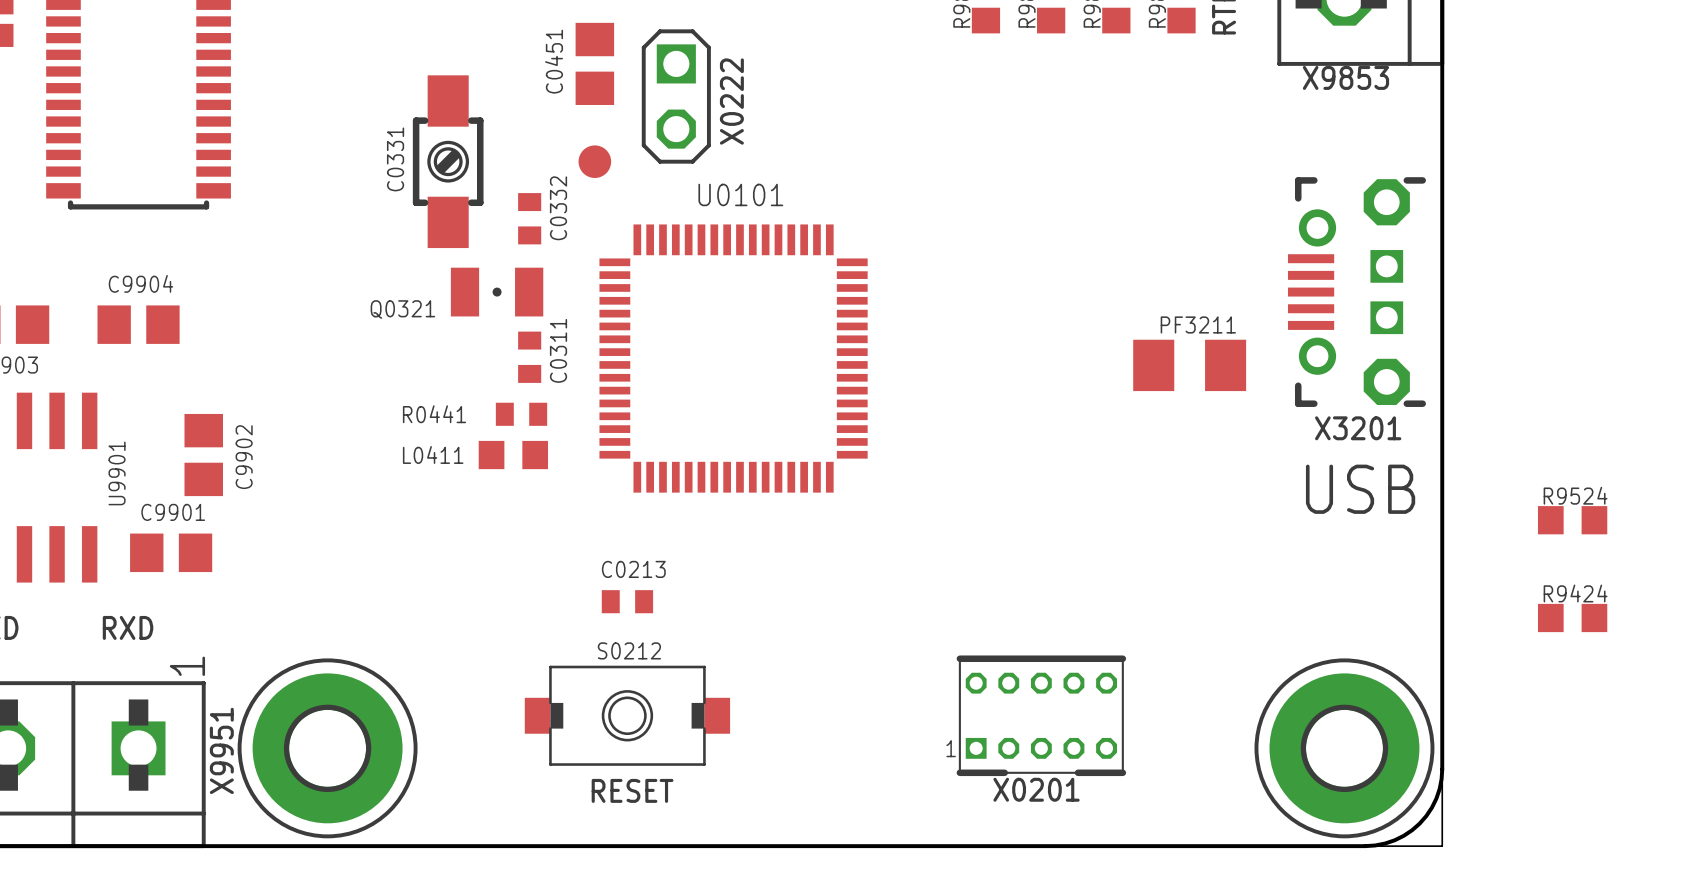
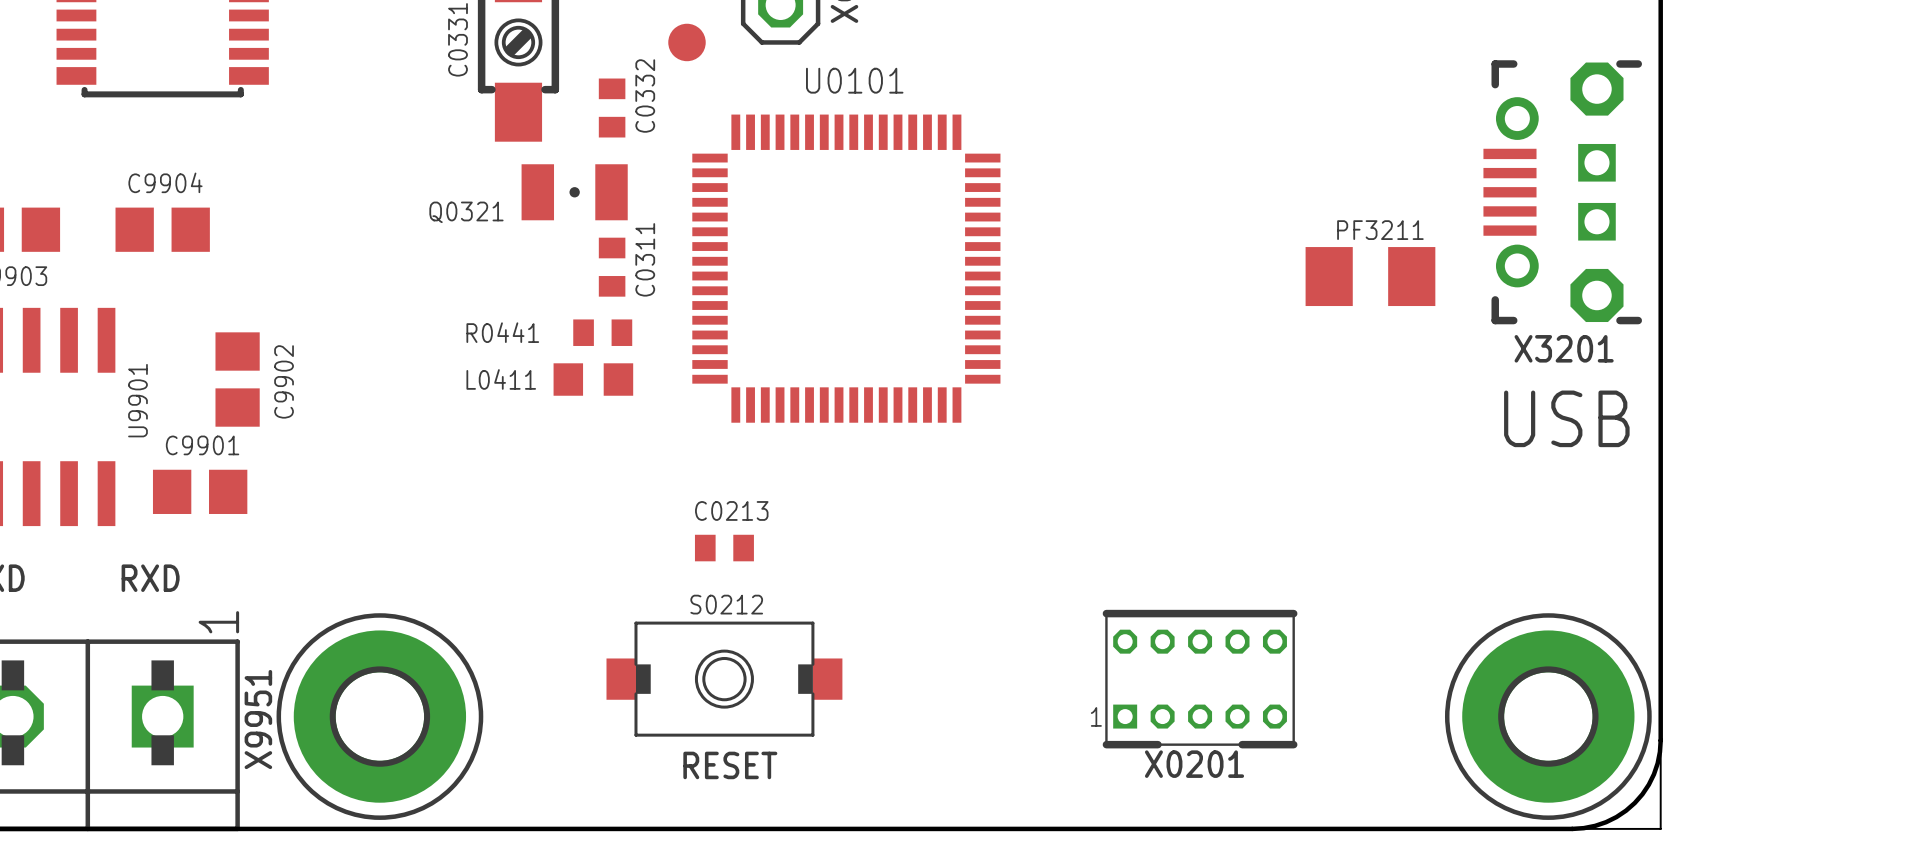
R9524: (1572, 520) -> none
R9424: (1572, 617) -> none

